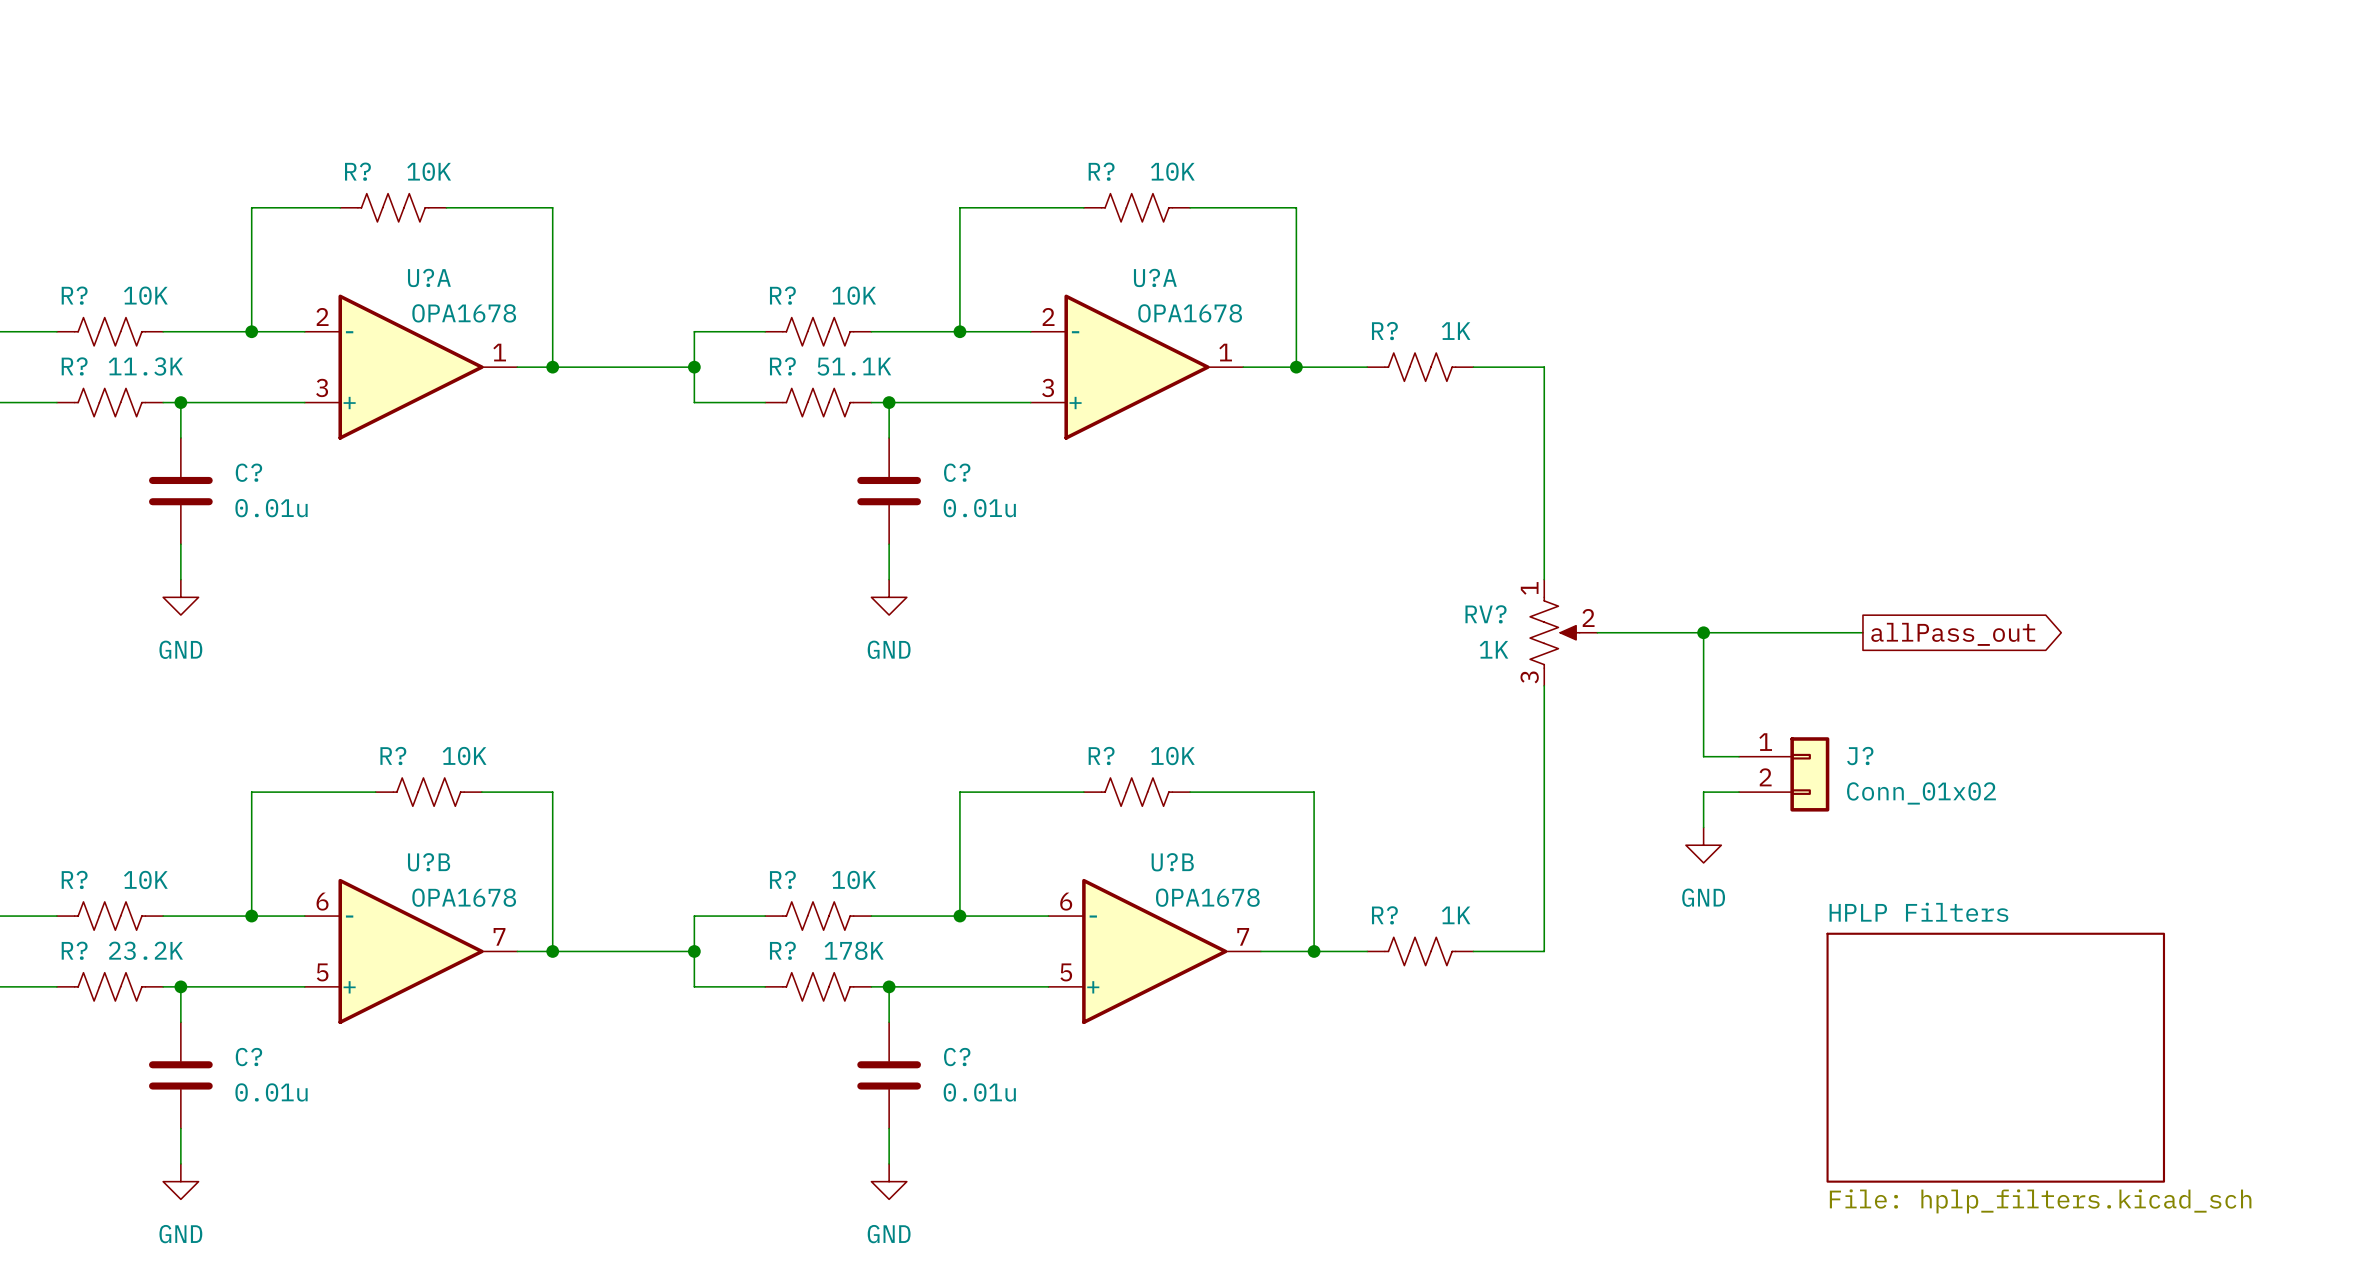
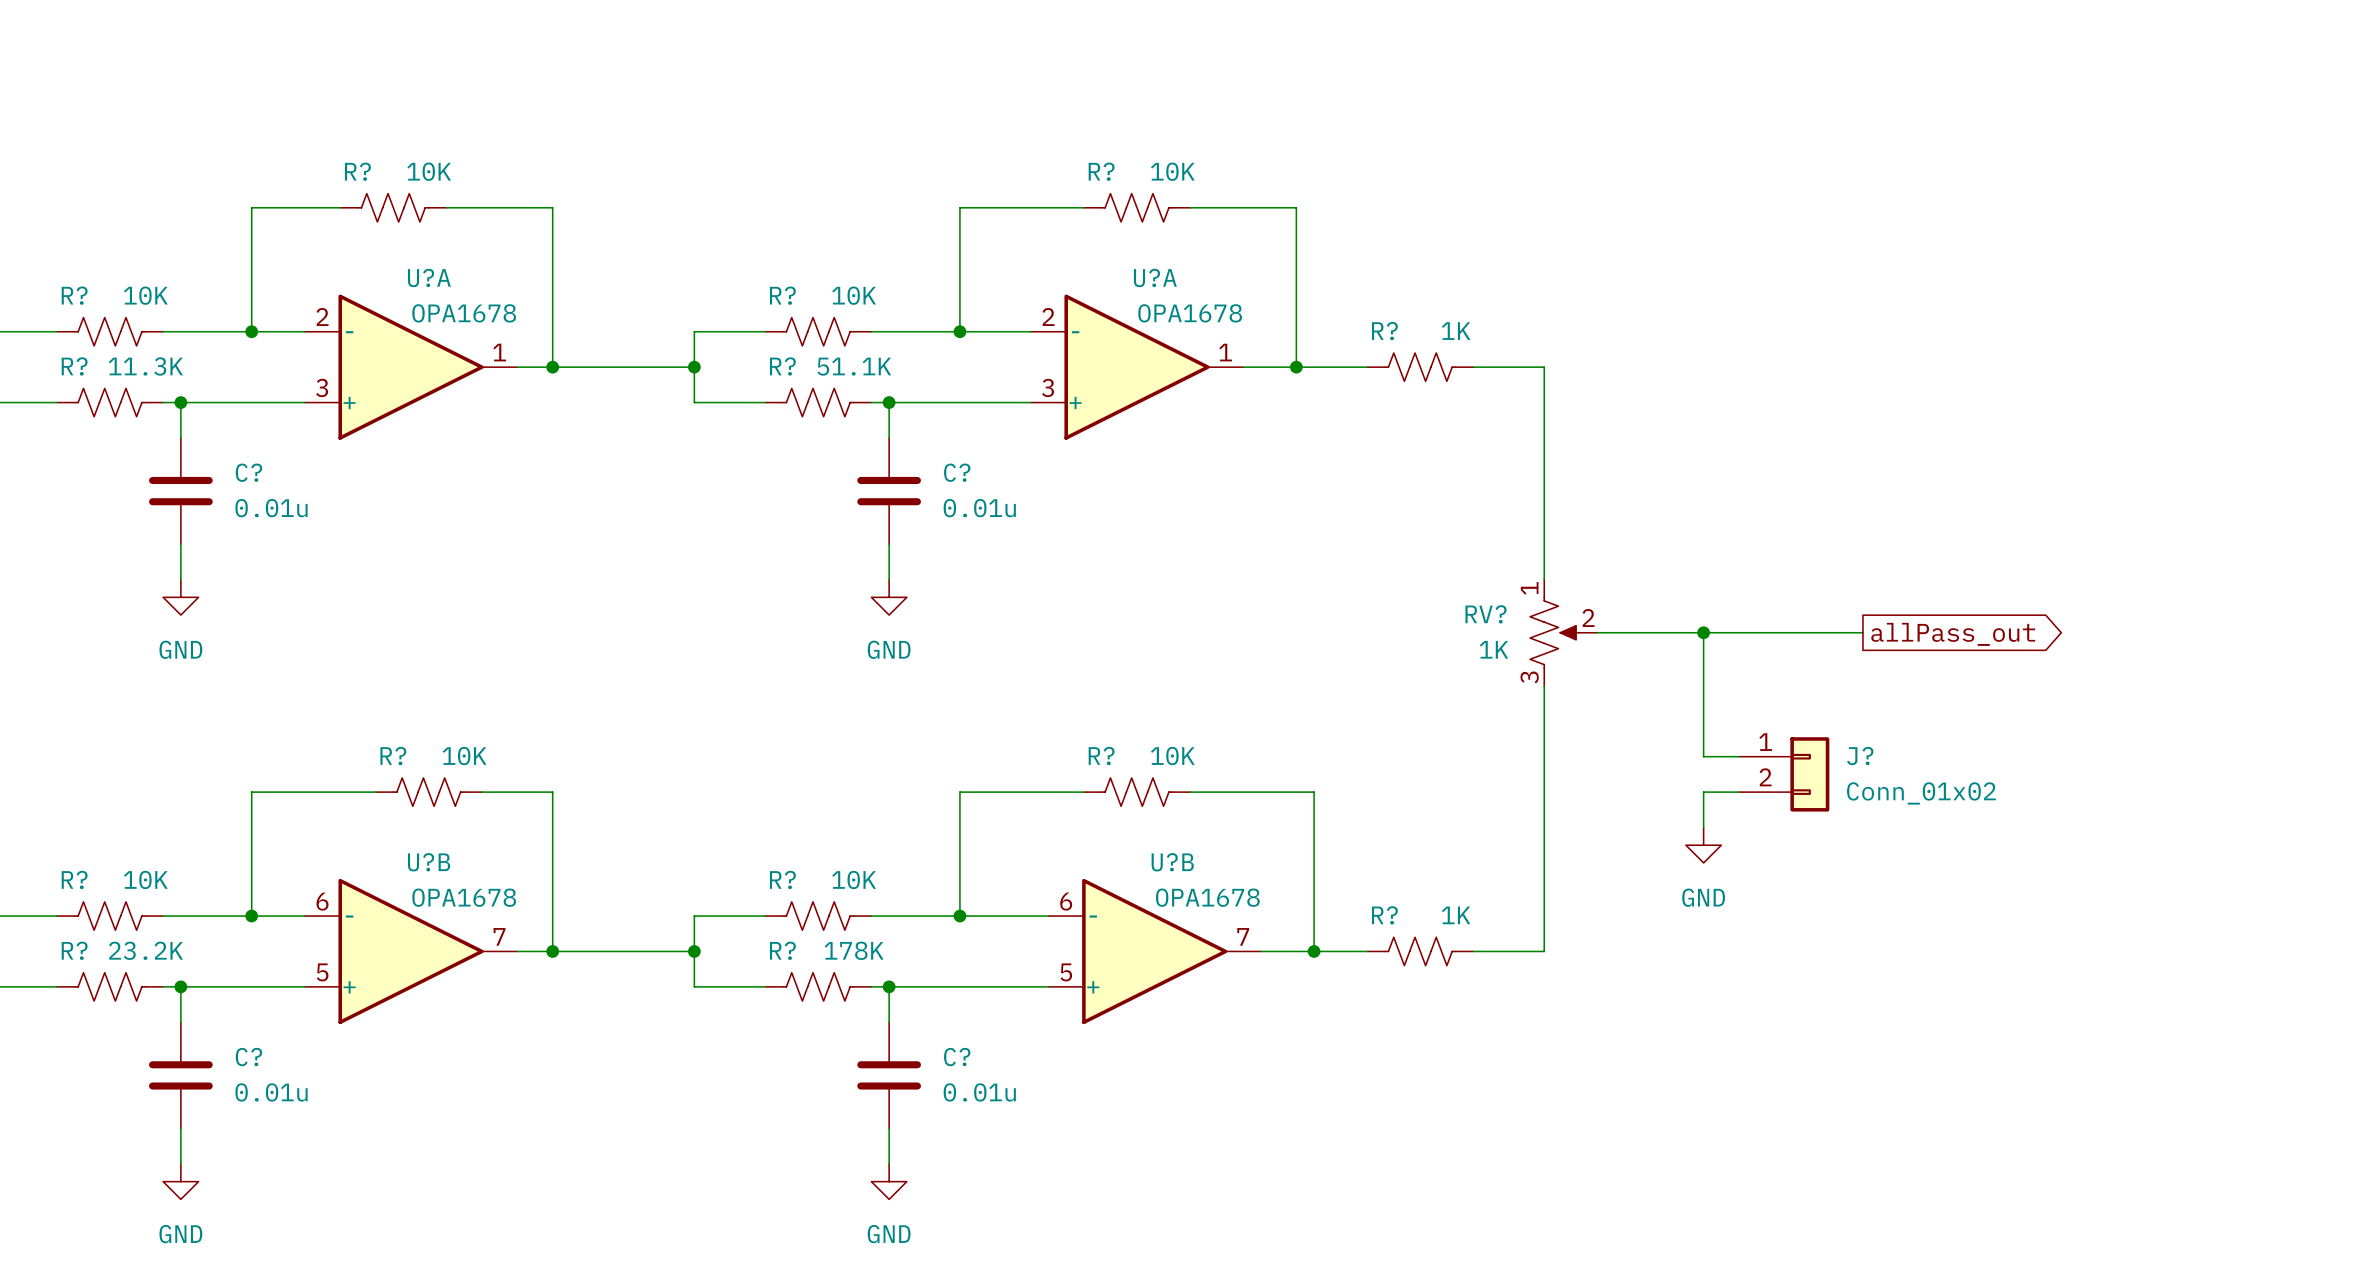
sheet HPLP Filters: File: hplp_filters.kicad_sch (1995, 1057) -> none

